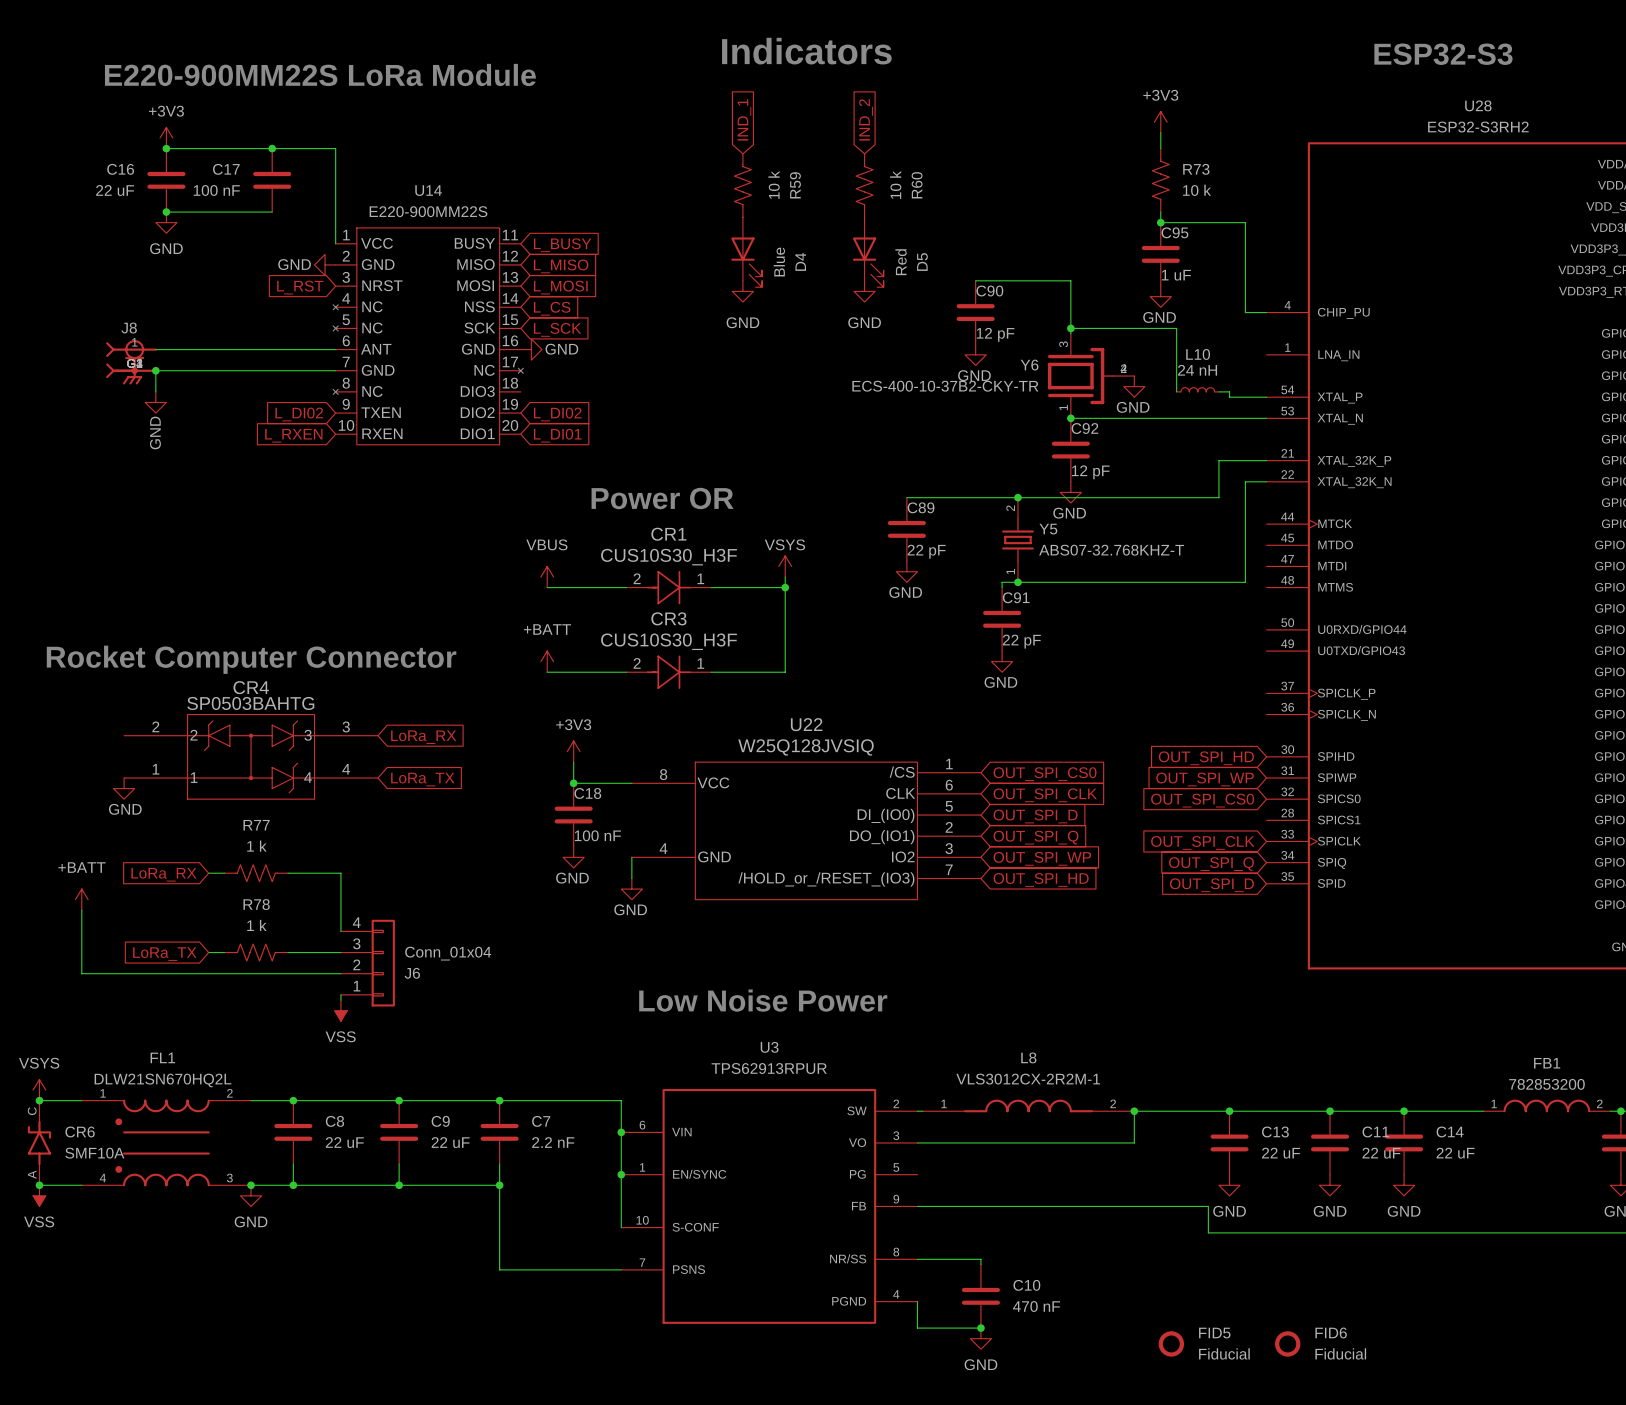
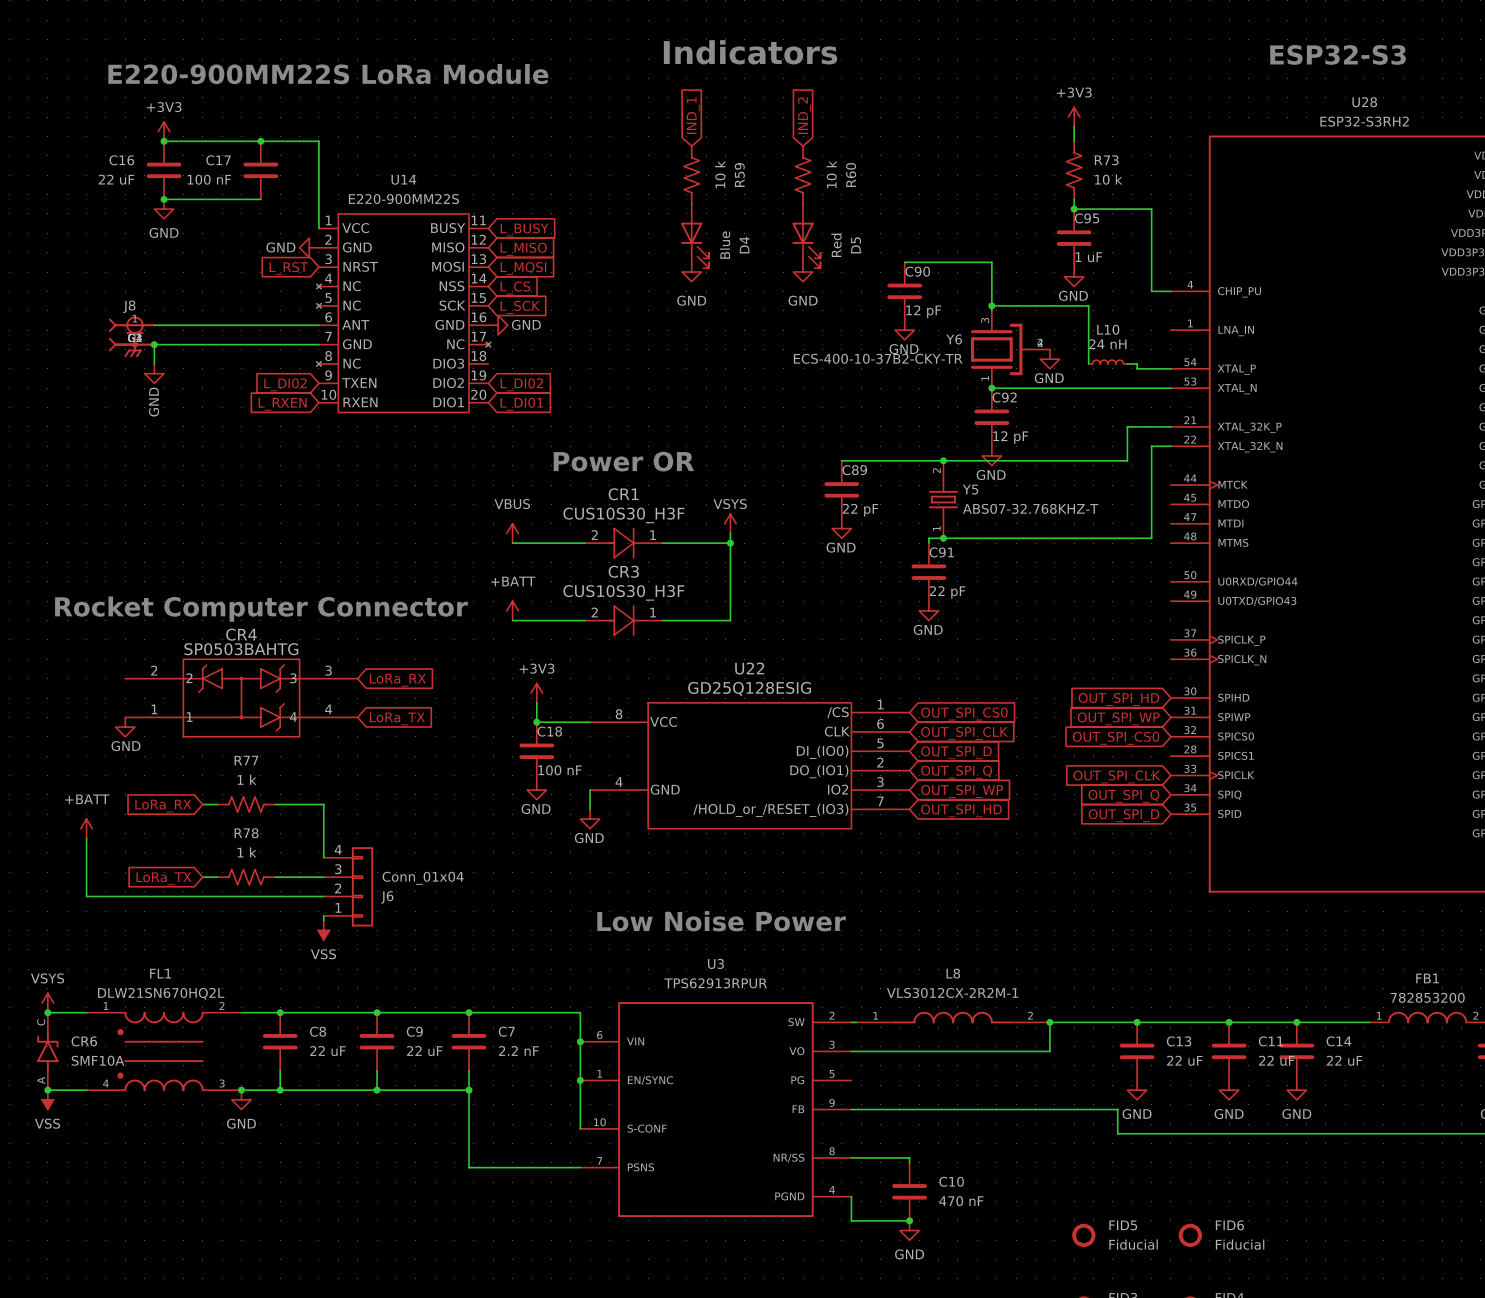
U22 value: W25Q128JVSIQ (806, 747) -> GD25Q128ESIG (749, 688)

